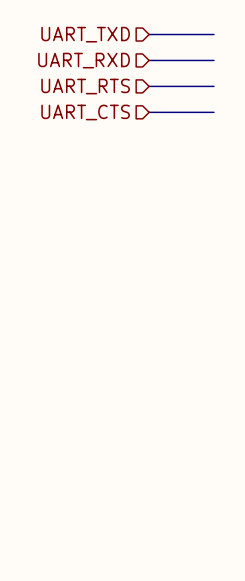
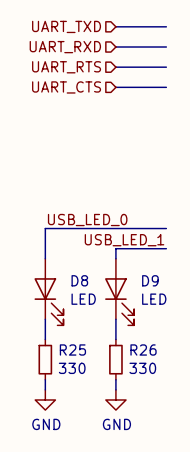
label: none -> USB_LED_0 (87, 220)
wire: none -> (166, 228) (45, 228) (45, 258)
label: none -> USB_LED_1 (124, 240)
wire: none -> (166, 248) (115, 248) (115, 258)
D8: none -> LED (48, 292)
D9: none -> LED (119, 292)
wire: none -> (45, 319) (45, 339)
wire: none -> (115, 319) (115, 339)
R25: none -> 330 (45, 359)
R26: none -> 330 (115, 359)
wire: none -> (45, 379) (45, 389)
wire: none -> (115, 379) (115, 389)
power symbol: none -> GND (45, 399)
power symbol: none -> GND (115, 399)

